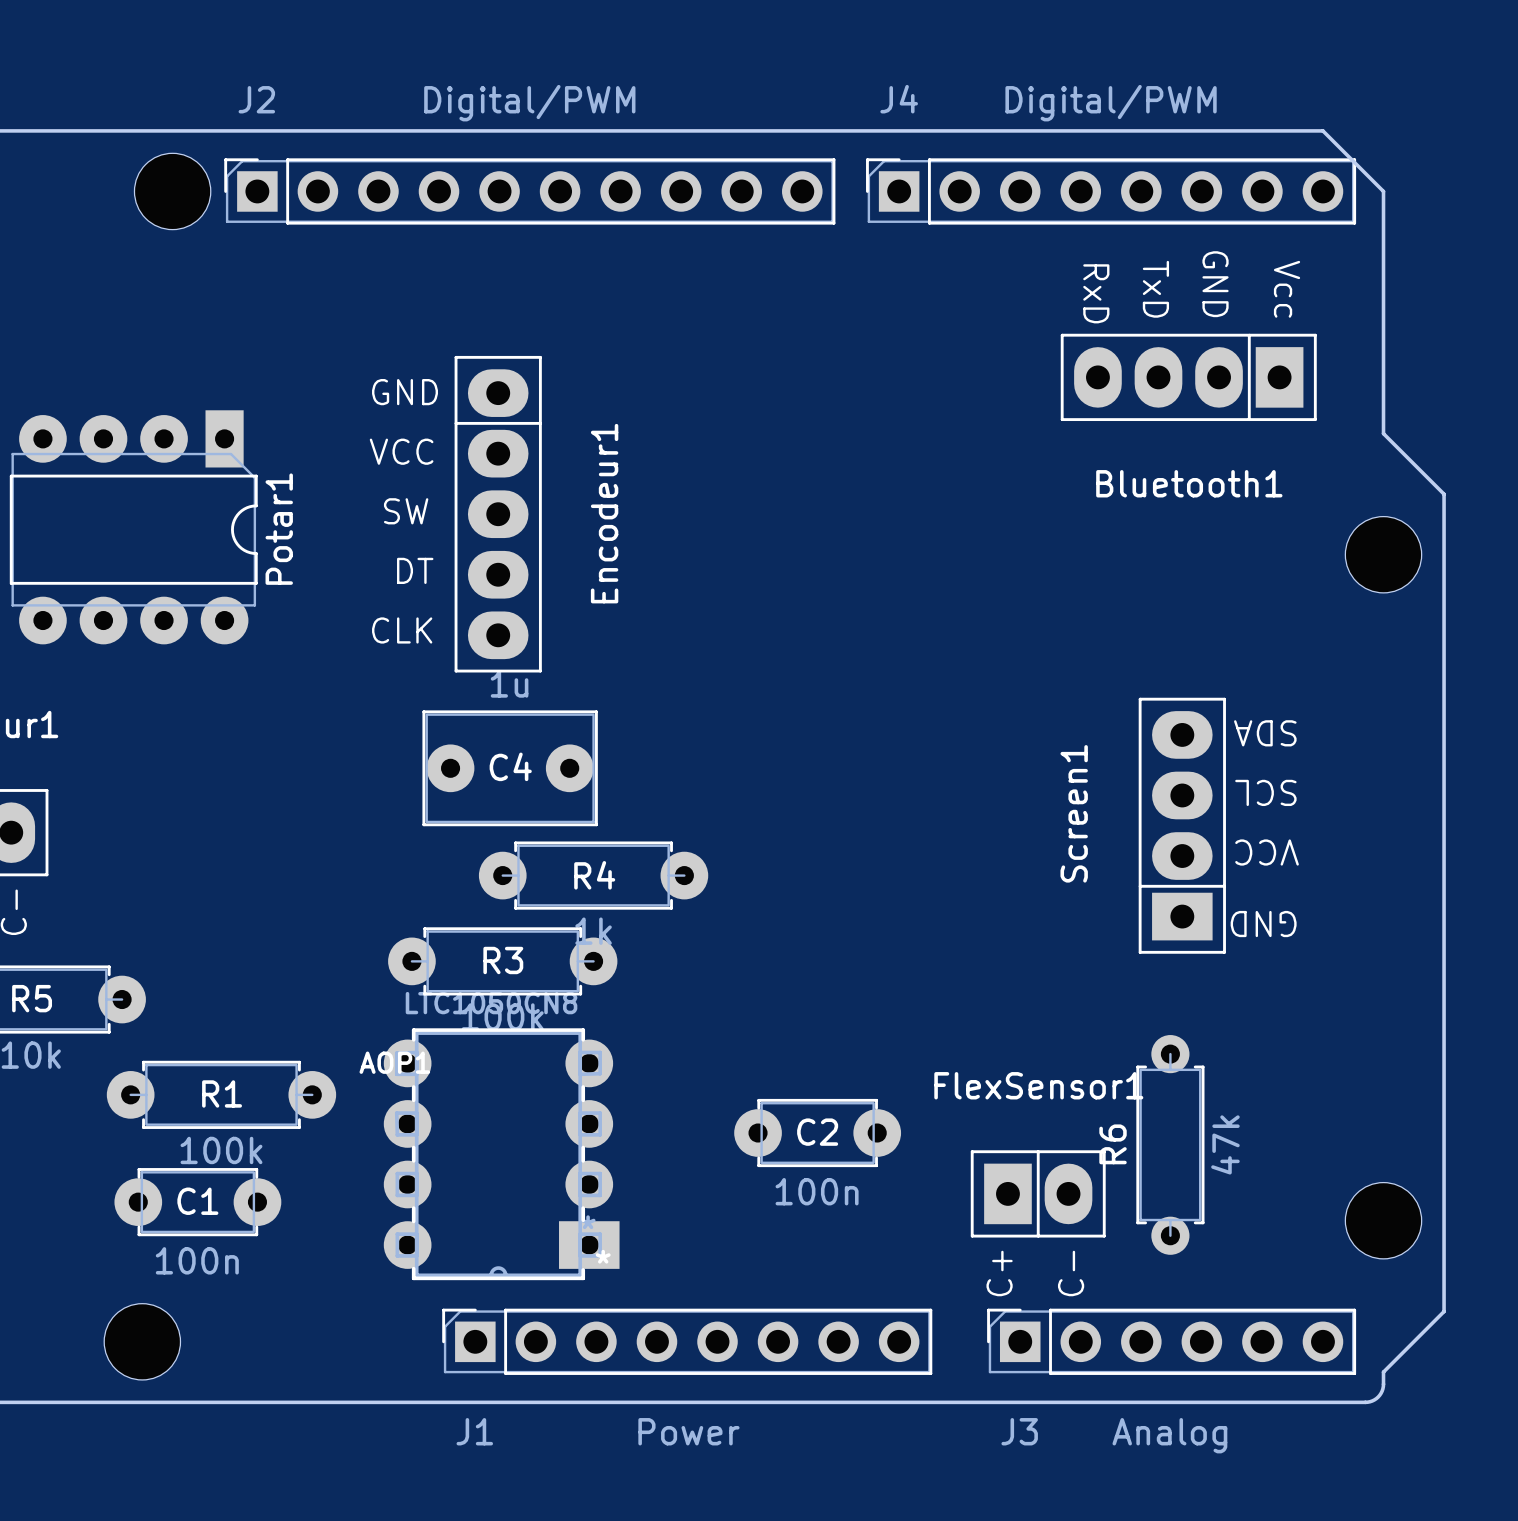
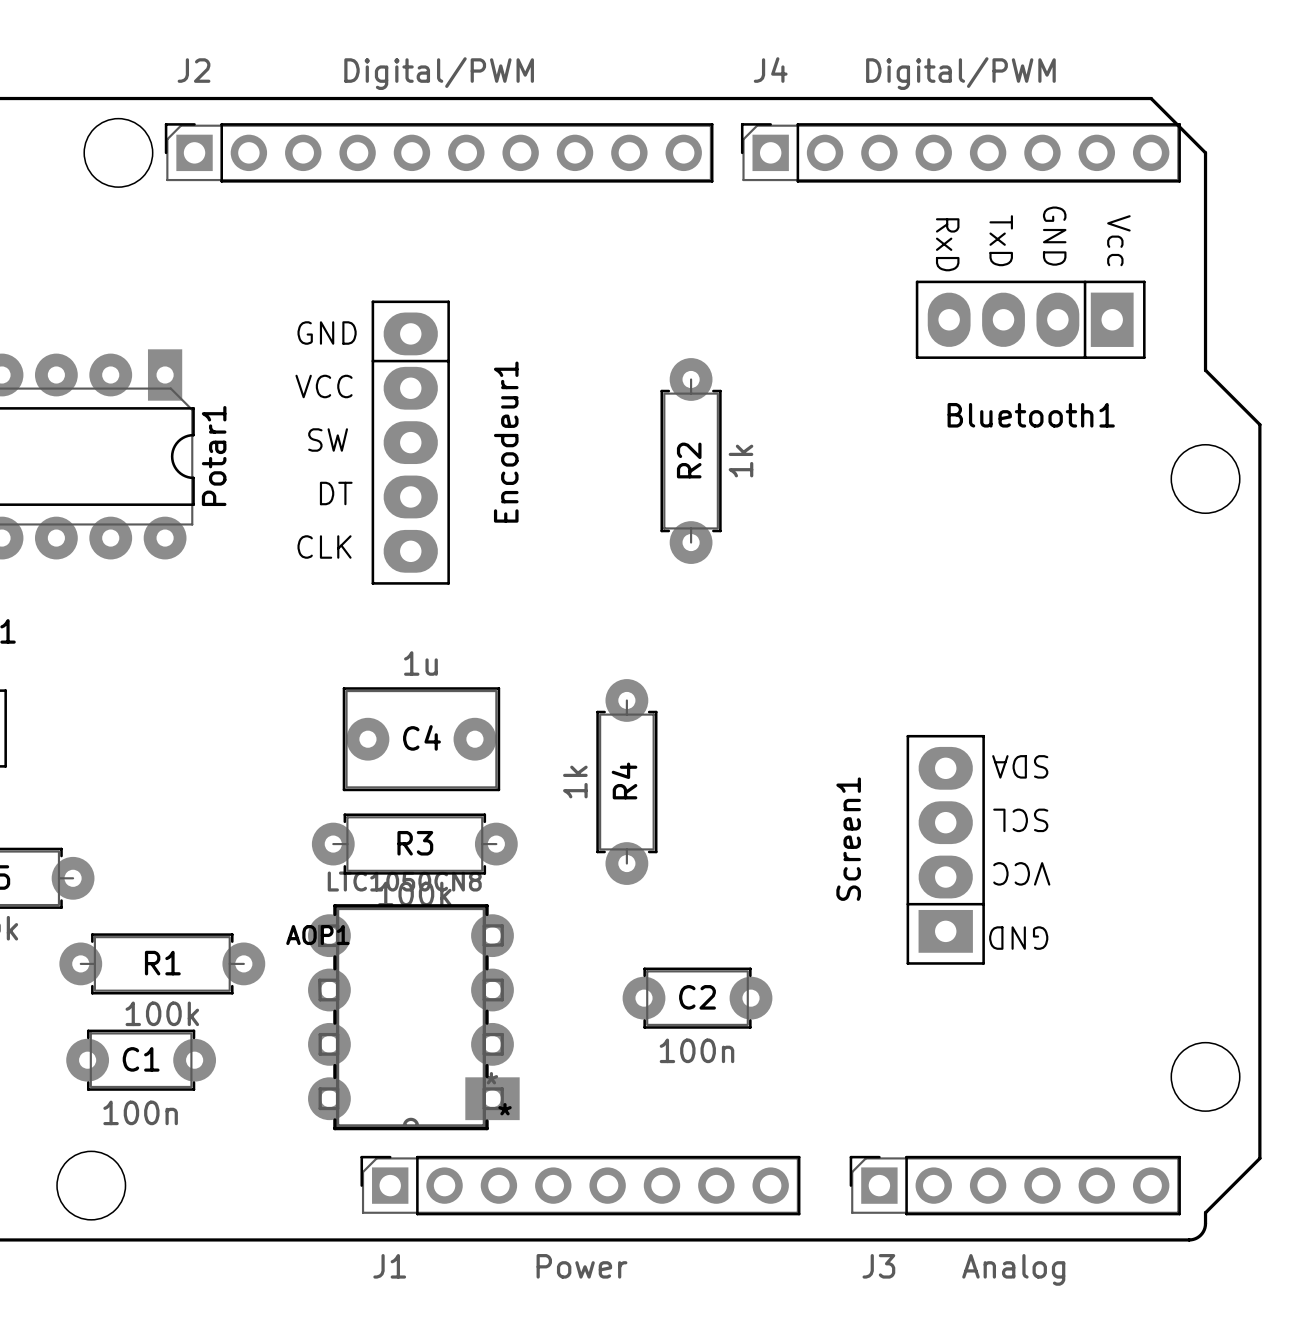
R2: none -> 1k (691, 461)
C4 position: (510, 768) -> (421, 739)
Screen1 position: (1182, 825) -> (945, 849)
R4 rotation: 0° (593, 875) -> 90° clockwise (626, 782)
R4 position: (593, 875) -> (626, 782)
R6: 47k (1170, 1144) -> none
FlexSensor1: (1038, 1193) -> none

